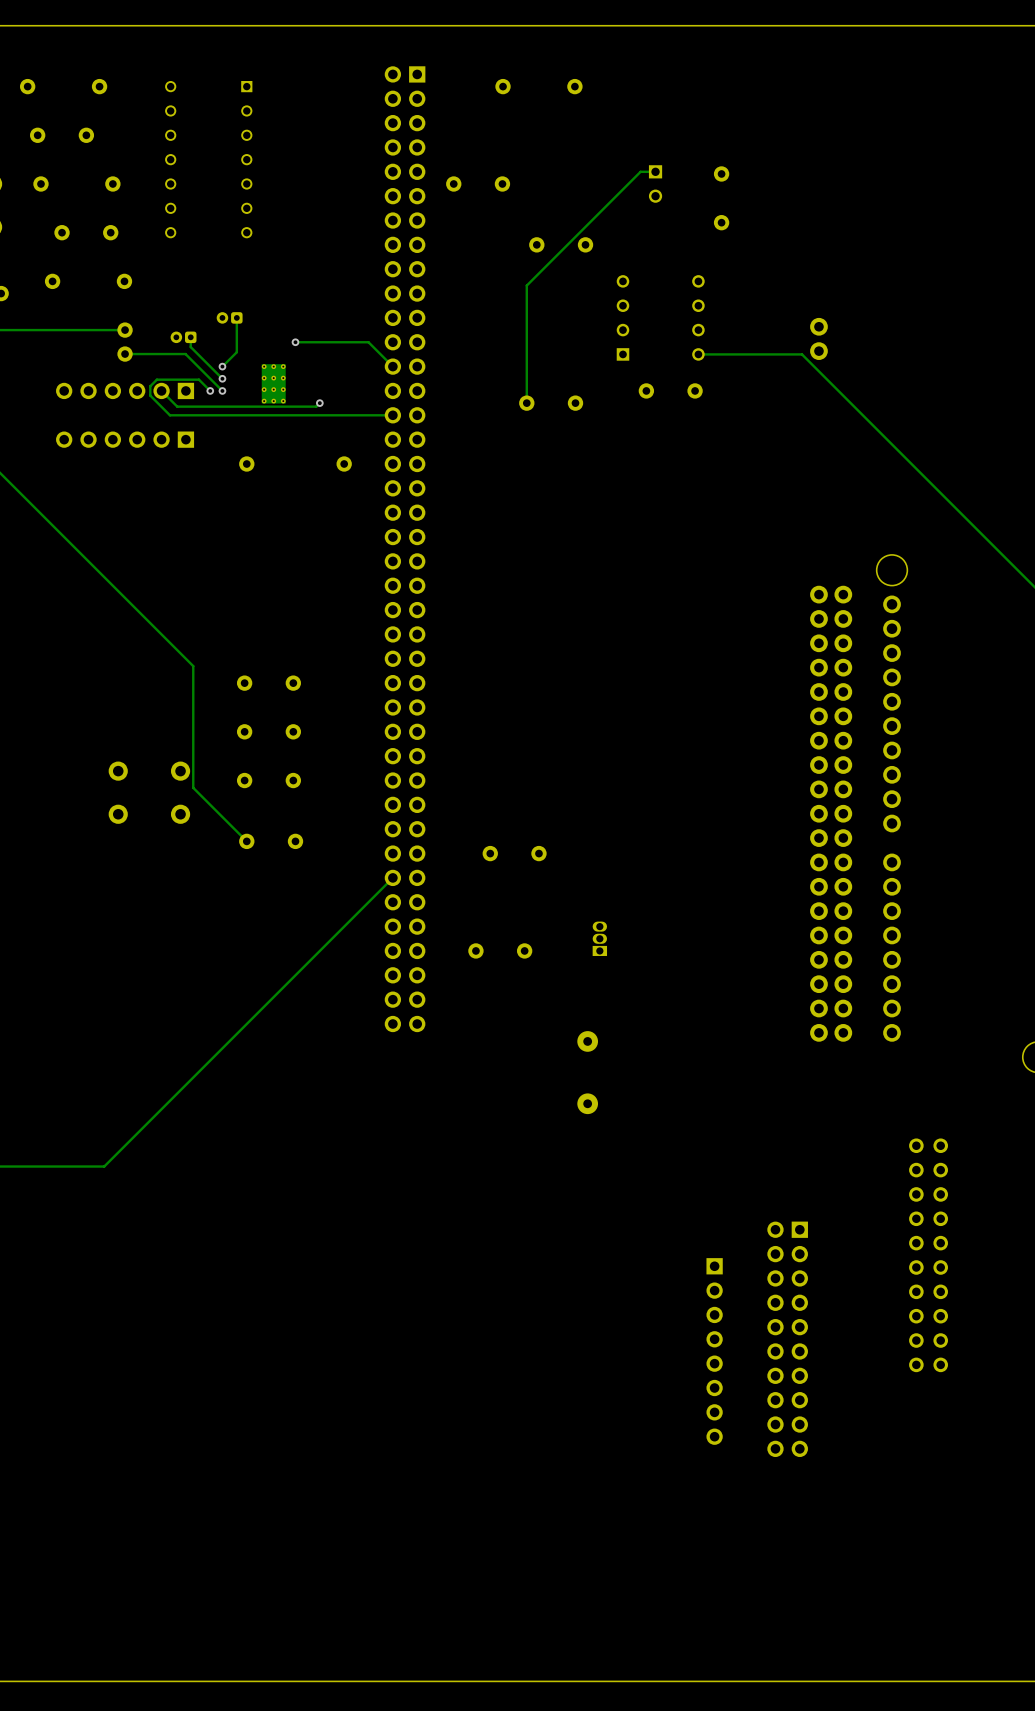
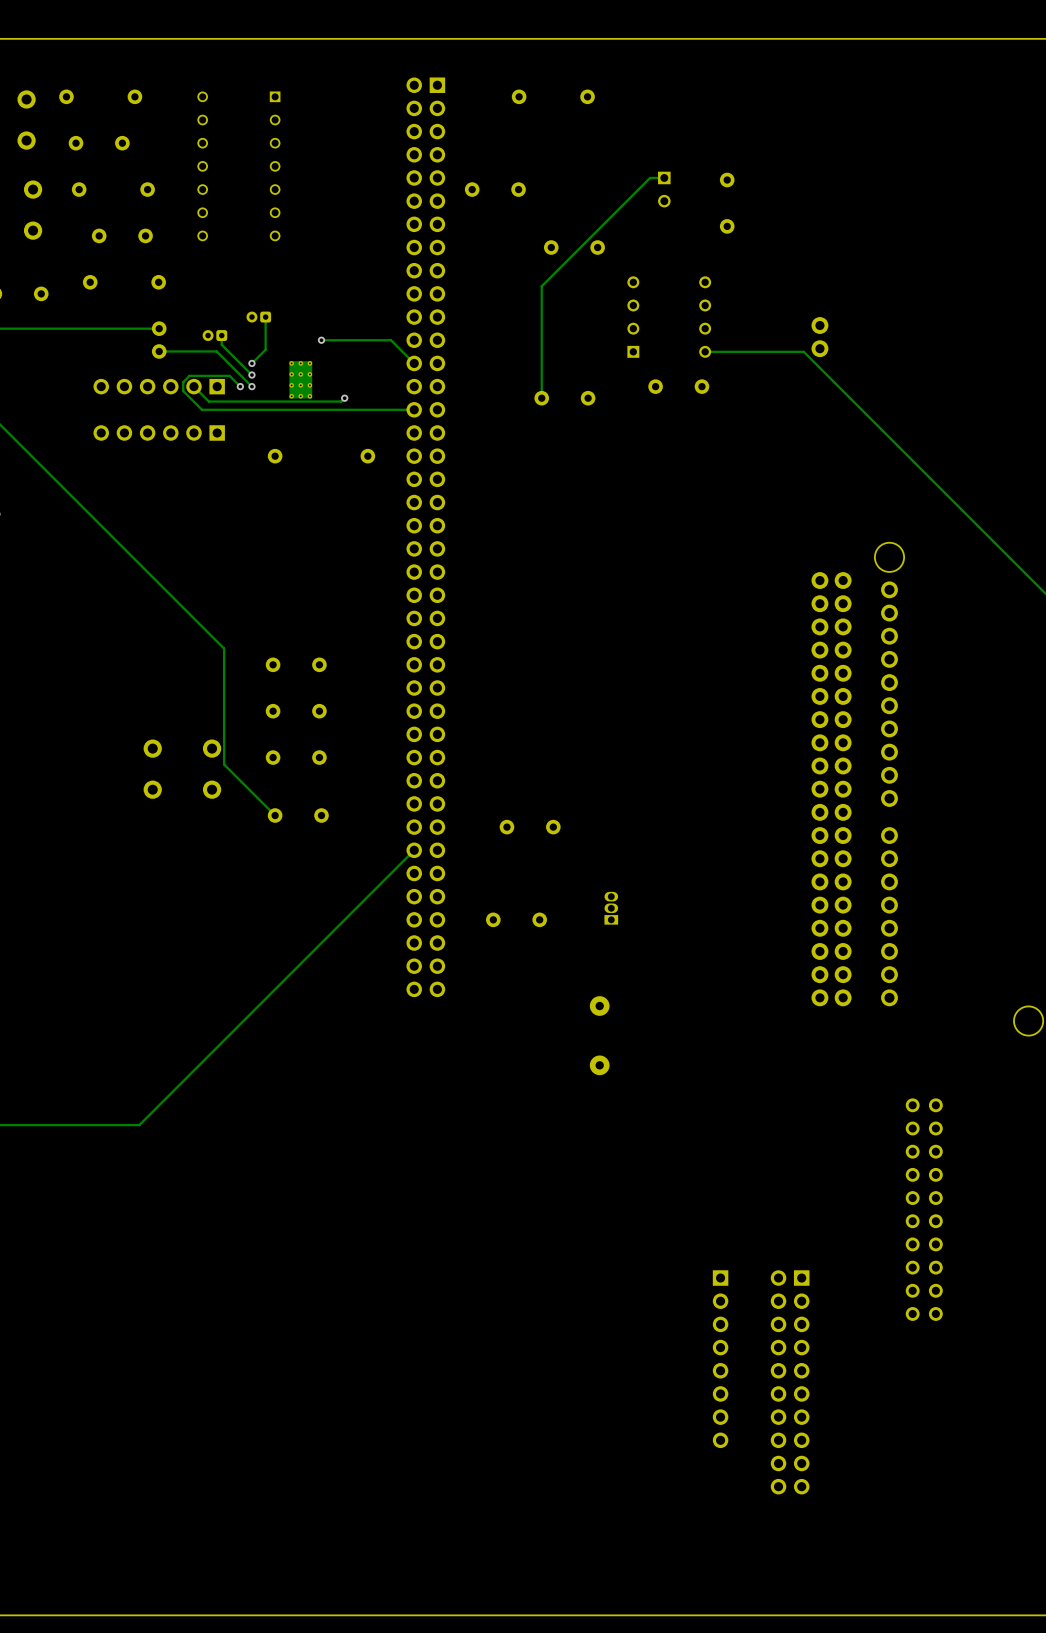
part position: (787, 1339) -> (790, 1382)
part position: (714, 1351) -> (720, 1359)

